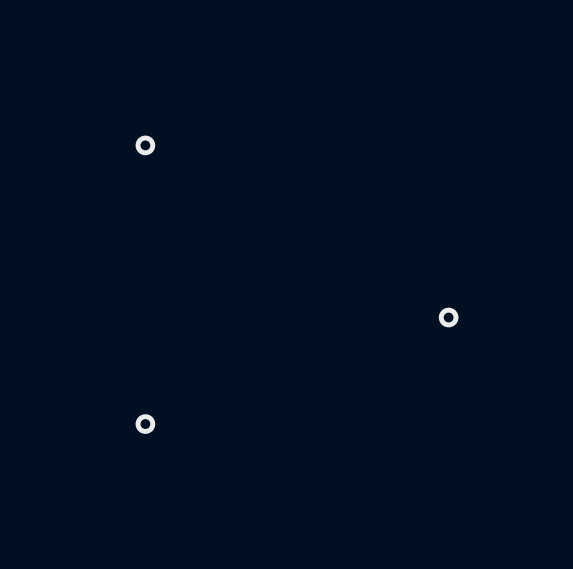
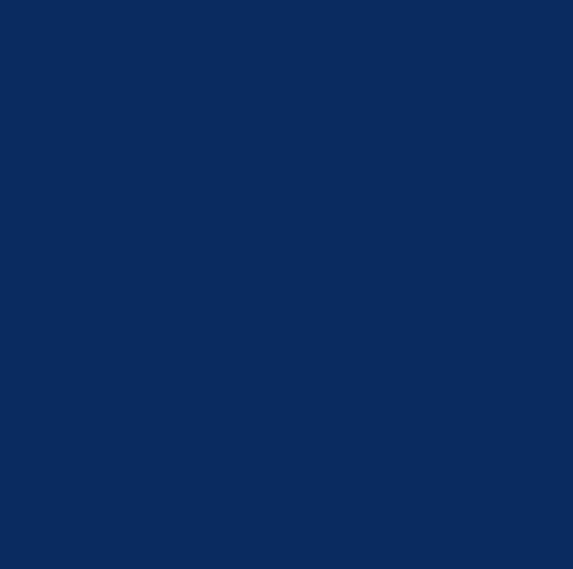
via: (145, 145) -> none
via: (448, 317) -> none
via: (145, 424) -> none

